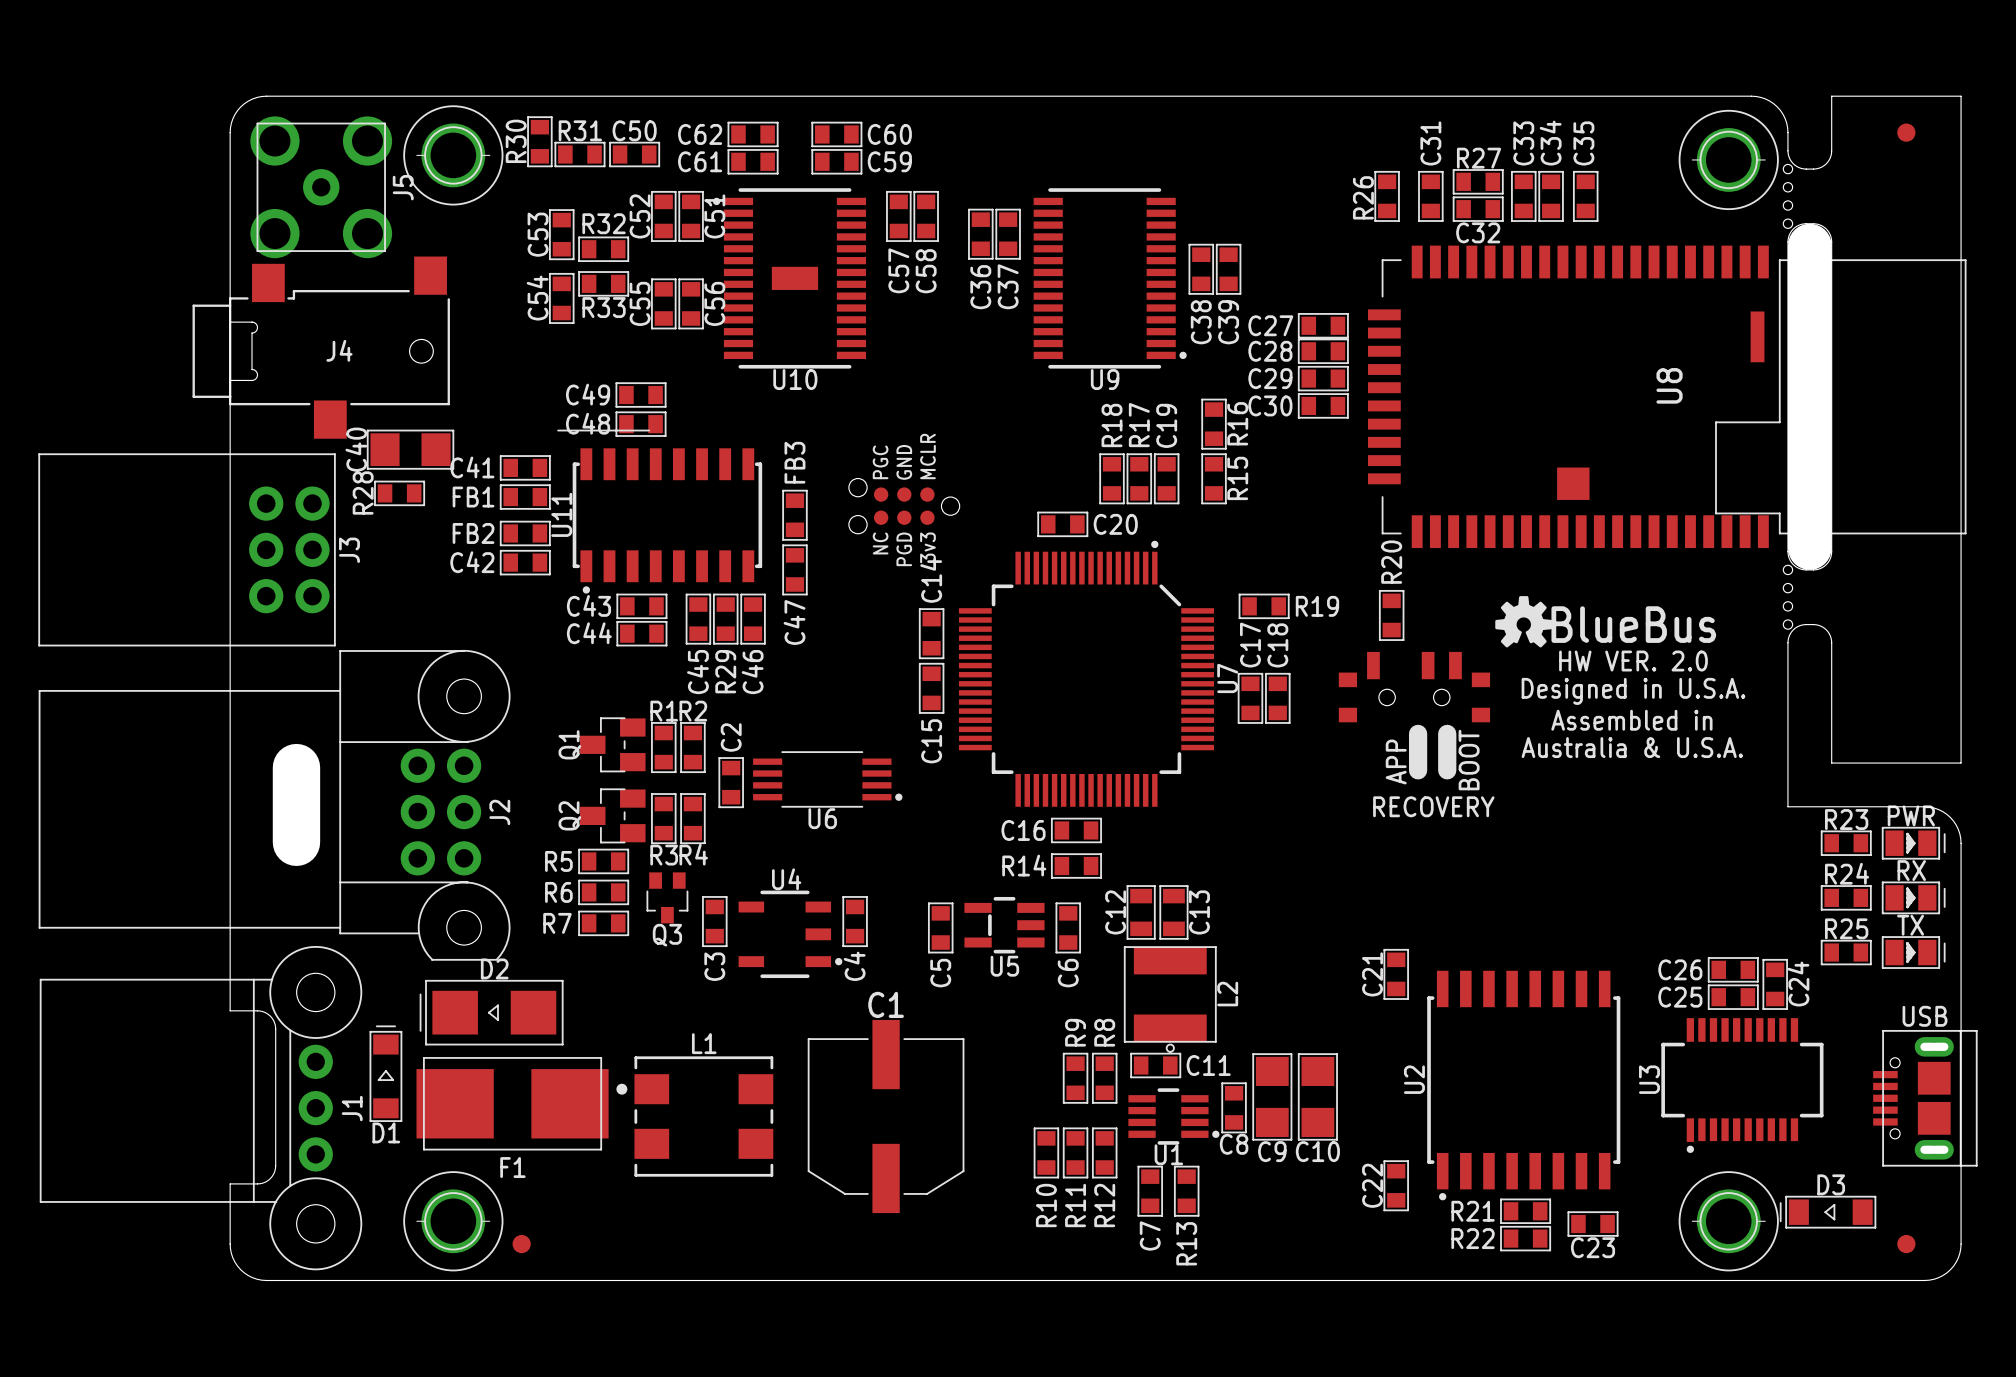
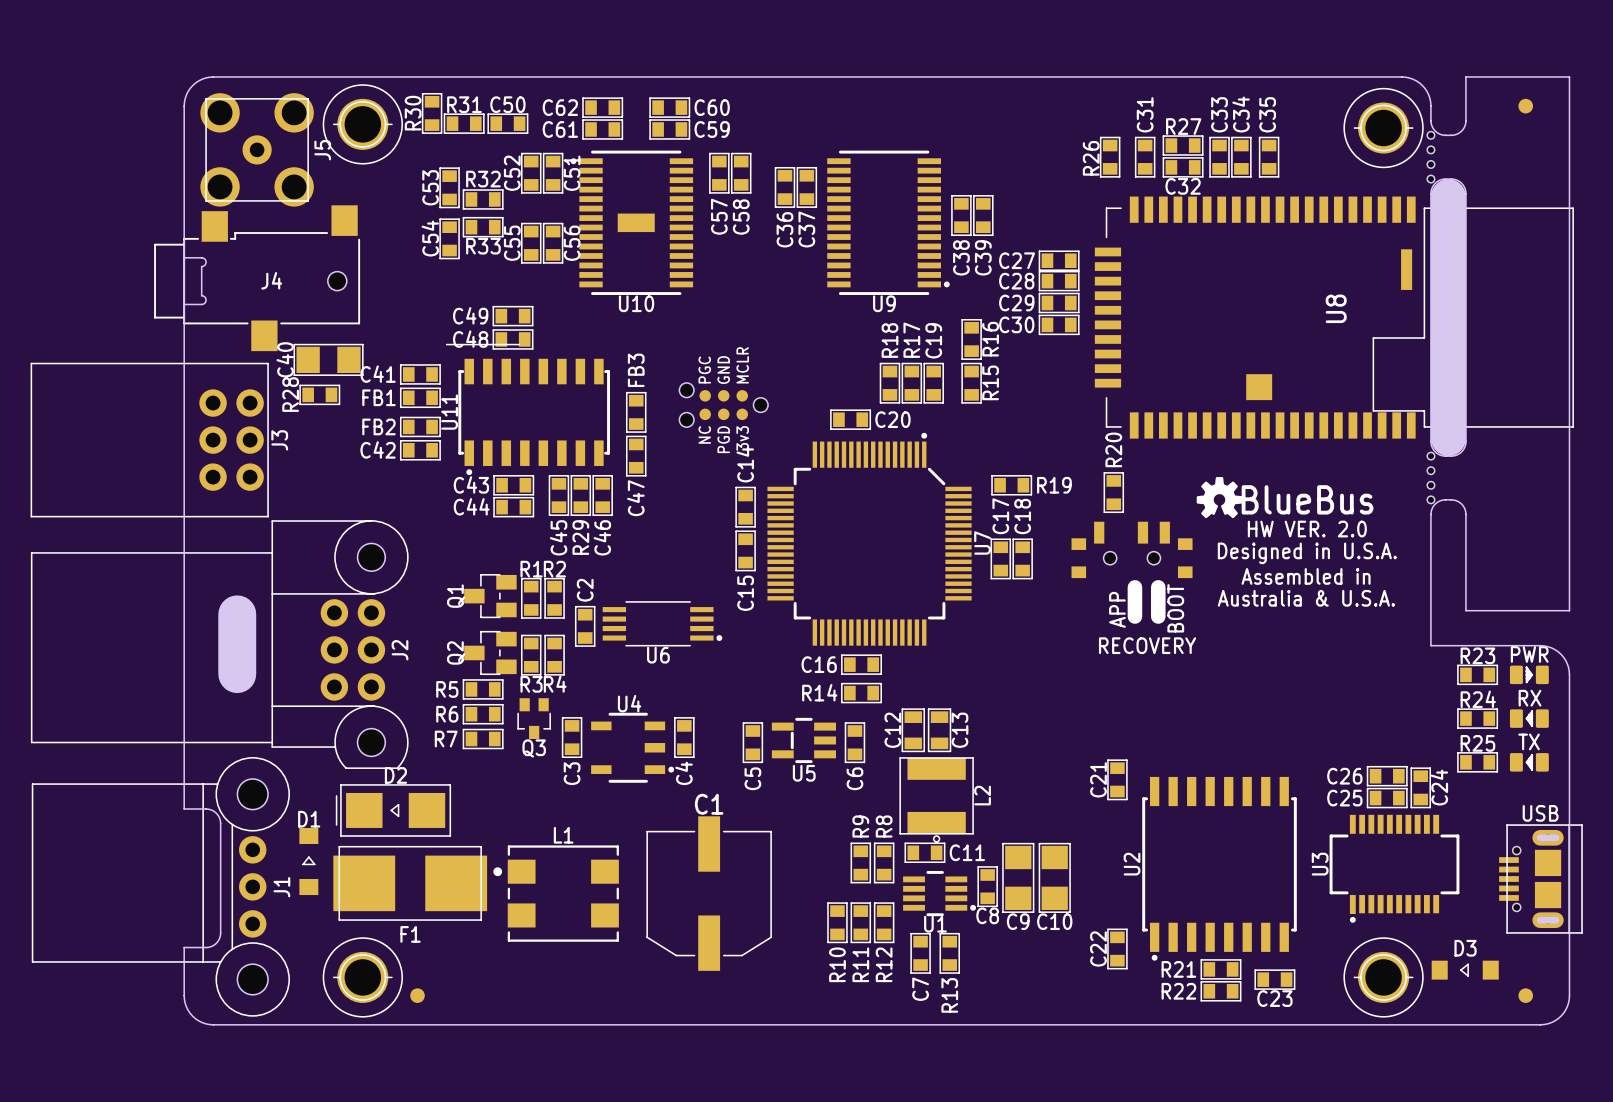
PWR footprint: [1881, 826, 1946, 860] -> [1509, 665, 1549, 685]
RX footprint: [1881, 881, 1946, 915] -> [1509, 709, 1549, 728]
TX footprint: [1881, 936, 1946, 969] -> [1509, 753, 1549, 772]
D1 footprint: [369, 1025, 403, 1122] -> [299, 827, 319, 896]
D1 name position: D1 (386, 1132) -> D1 (309, 819)
D3 footprint: [1779, 1195, 1877, 1229] -> [1431, 960, 1499, 980]

